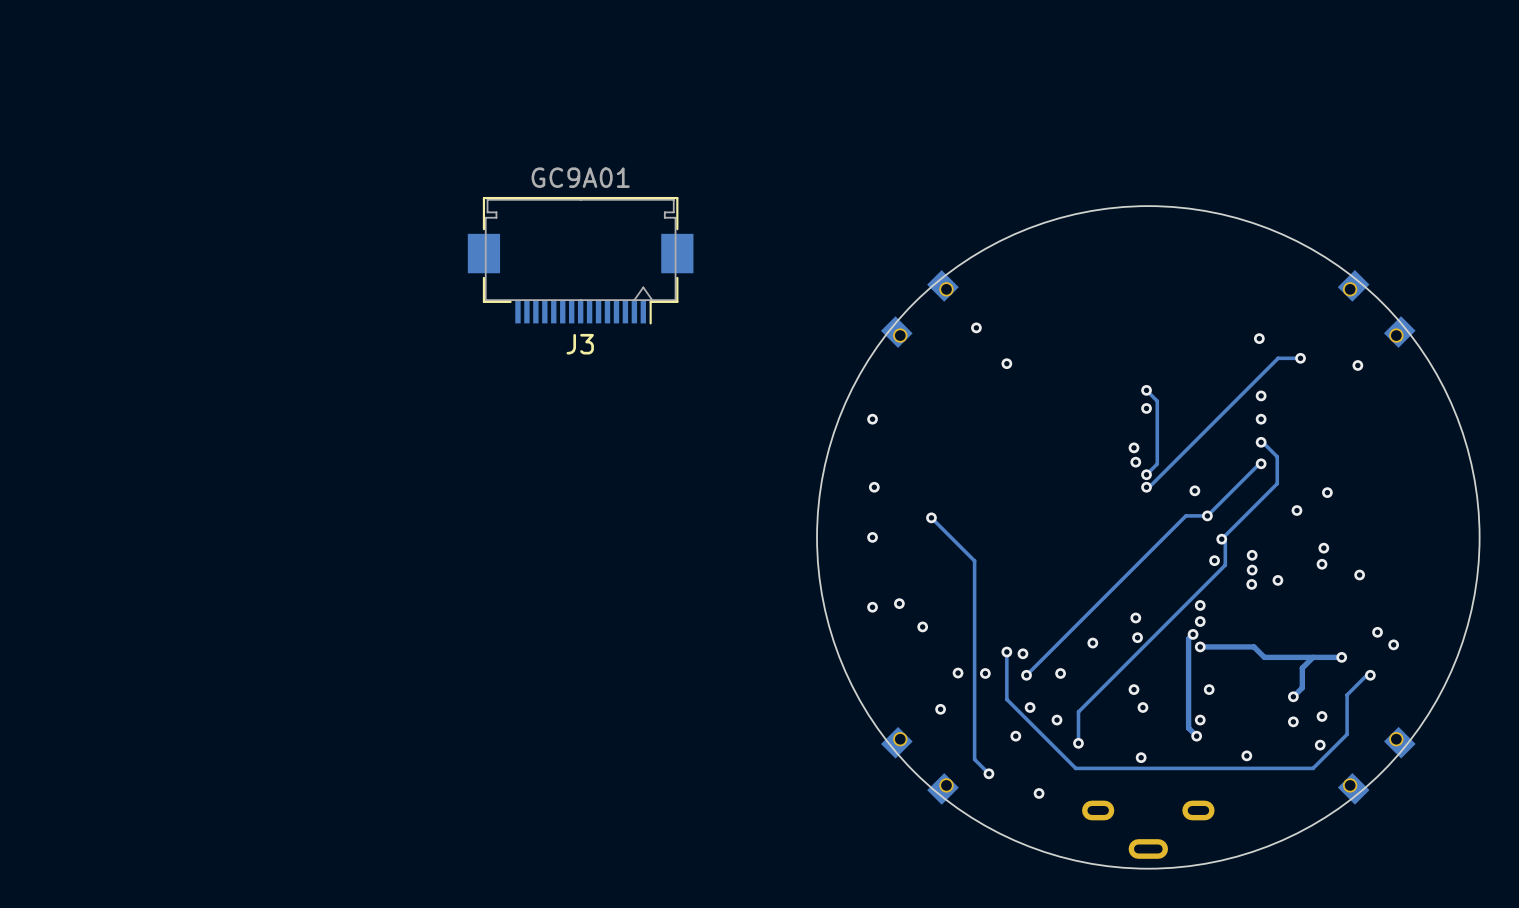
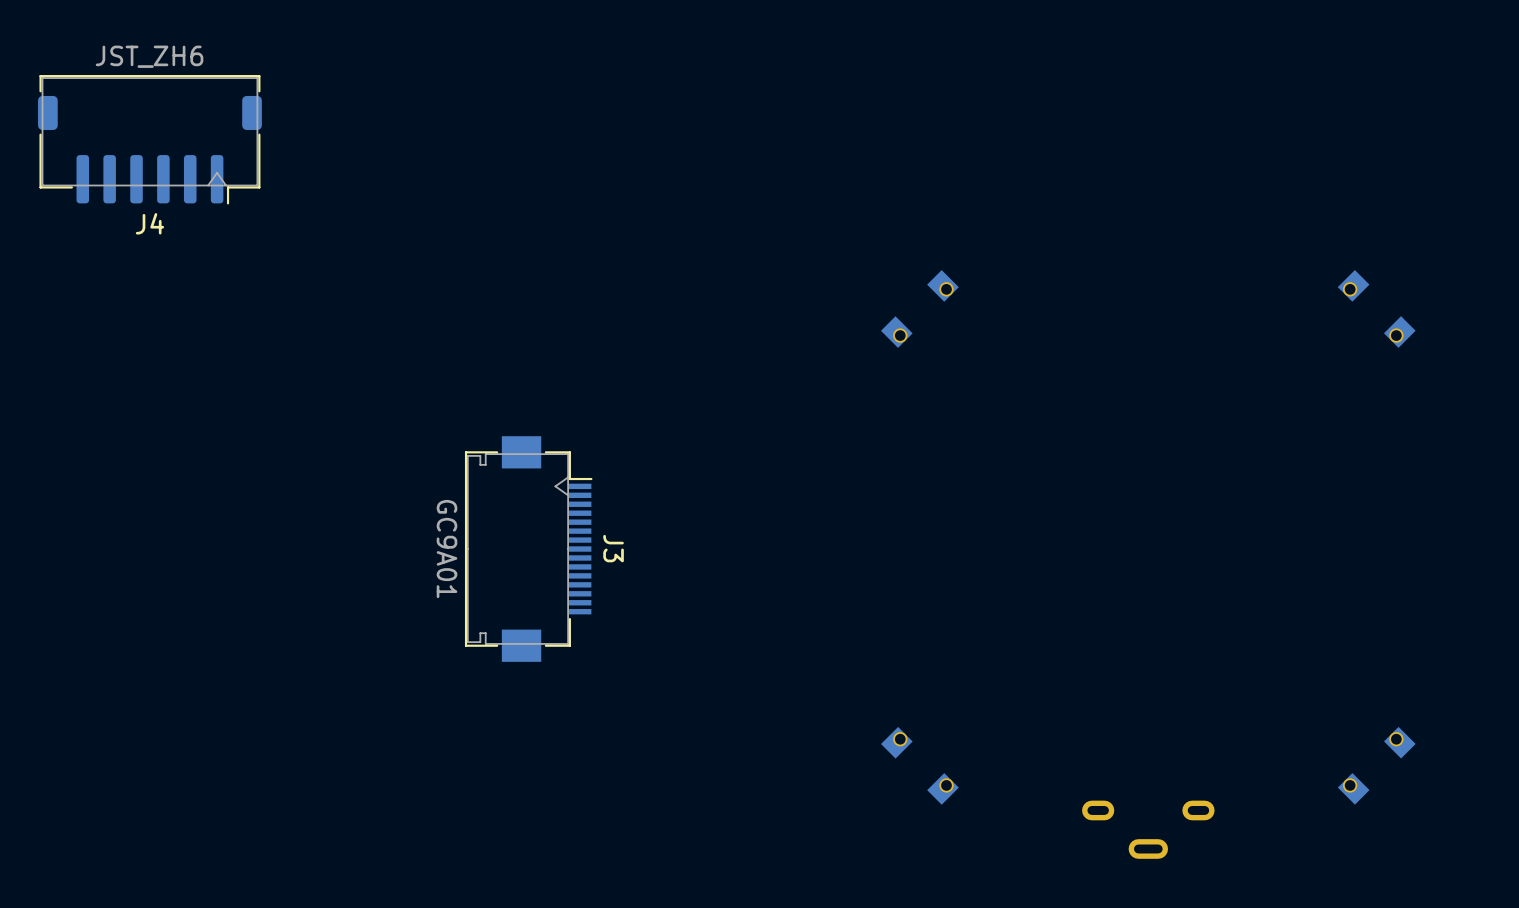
J4: none -> JST_ZH6 (149, 139)
round board edge: [816, 205, 1481, 870] -> none
J3 rotation: 0° (580, 260) -> 90° counterclockwise (528, 549)
J3 position: (580, 260) -> (528, 549)
via: (976, 327) -> none
via: (1259, 338) -> none
track: (1300, 358) (1278, 358) (1149, 487) (1146, 487) -> none
via: (1300, 358) -> none
via: (1006, 363) -> none
via: (1357, 365) -> none
track: (1146, 390) (1157, 401) (1157, 463) (1146, 474) -> none
via: (1146, 390) -> none
via: (1261, 395) -> none
via: (1146, 408) -> none
via: (872, 419) -> none
via: (1261, 419) -> none
track: (1261, 442) (1277, 456) (1277, 483) (1221, 539) (1225, 542) (1225, 565) (1078, 711) (1078, 743) -> none
via: (1261, 442) -> none
via: (1133, 447) -> none
via: (1135, 462) -> none
track: (1261, 463) (1207, 515) (1185, 515) (1026, 675) -> none
via: (1261, 463) -> none
via: (1146, 474) -> none
via: (874, 487) -> none
via: (1146, 487) -> none
via: (1194, 490) -> none
via: (1327, 492) -> none
via: (1296, 510) -> none
via: (1207, 515) -> none
track: (931, 517) (974, 560) (974, 759) (988, 773) -> none
via: (931, 517) -> none
via: (872, 537) -> none
via: (1221, 539) -> none
via: (1323, 548) -> none
via: (1252, 555) -> none
via: (1214, 560) -> none
via: (1322, 564) -> none
via: (1252, 570) -> none
via: (1359, 575) -> none
via: (1277, 580) -> none
via: (1251, 584) -> none
via: (899, 603) -> none
via: (1200, 605) -> none
via: (872, 607) -> none
via: (1135, 617) -> none
via: (1200, 621) -> none
via: (922, 626) -> none
via: (1377, 632) -> none
track: (1193, 634) (1188, 638) (1188, 728) (1196, 736) -> none
via: (1193, 634) -> none
via: (1137, 637) -> none
via: (1092, 643) -> none
via: (1393, 644) -> none
track: (1200, 646) (1253, 646) (1264, 657) (1341, 657) -> none
via: (1200, 646) -> none
track: (1006, 652) (1006, 699) (1075, 768) (1313, 768) (1347, 734) (1347, 694) (1366, 675) (1370, 675) -> none
via: (1006, 652) -> none
via: (1022, 653) -> none
track: (1313, 657) (1302, 668) (1302, 687) (1293, 696) -> none
via: (1341, 657) -> none
via: (958, 673) -> none
via: (985, 673) -> none
via: (1060, 673) -> none
via: (1026, 675) -> none
via: (1370, 675) -> none
via: (1133, 689) -> none
via: (1209, 689) -> none
via: (1293, 696) -> none
via: (1030, 707) -> none
via: (1142, 707) -> none
via: (940, 709) -> none
via: (1322, 716) -> none
via: (1056, 720) -> none
via: (1200, 720) -> none
via: (1293, 721) -> none
via: (1015, 736) -> none
via: (1196, 736) -> none
via: (1078, 743) -> none
via: (1320, 745) -> none
via: (1246, 755) -> none
via: (1141, 757) -> none
via: (988, 773) -> none
via: (1039, 793) -> none

